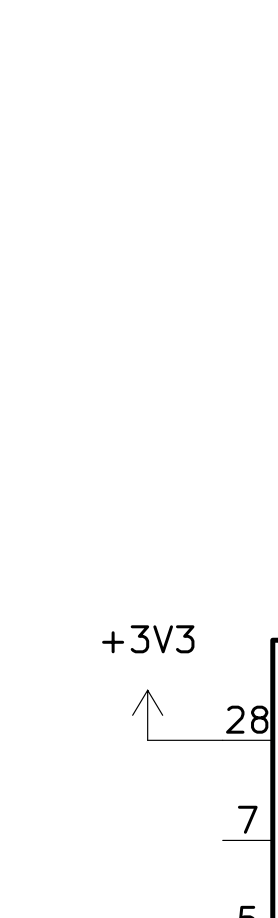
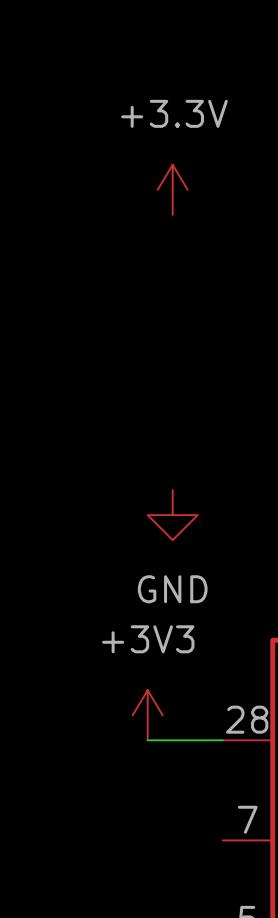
power symbol: none -> +3.3V (172, 189)
power symbol: none -> GND (172, 515)

